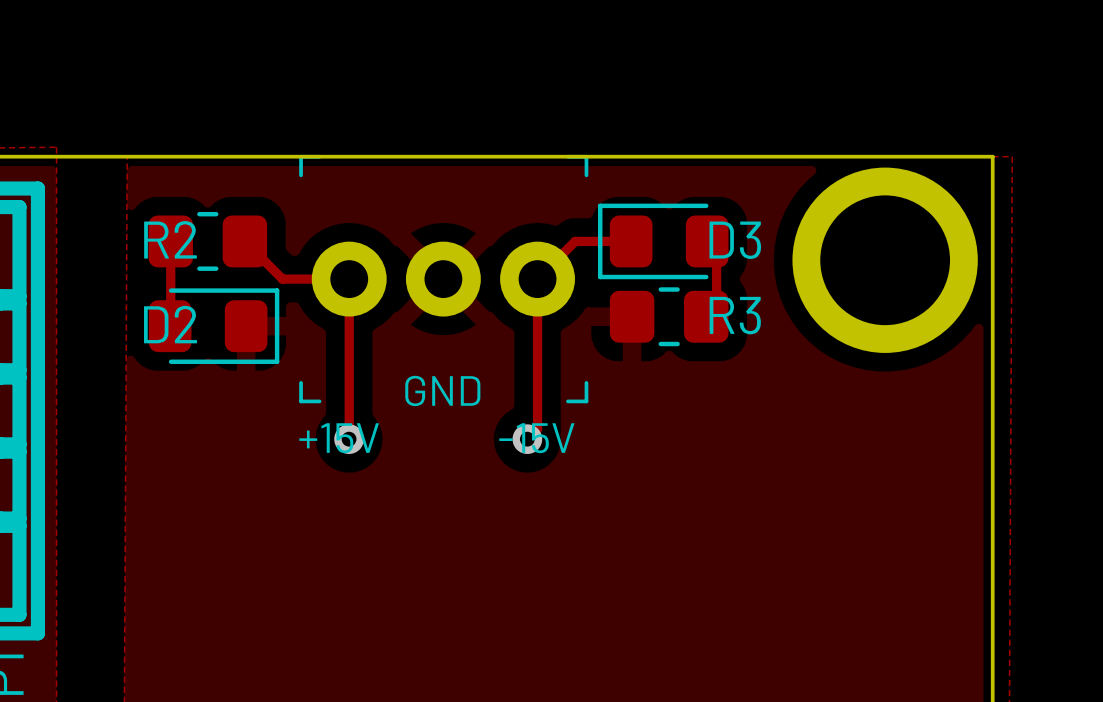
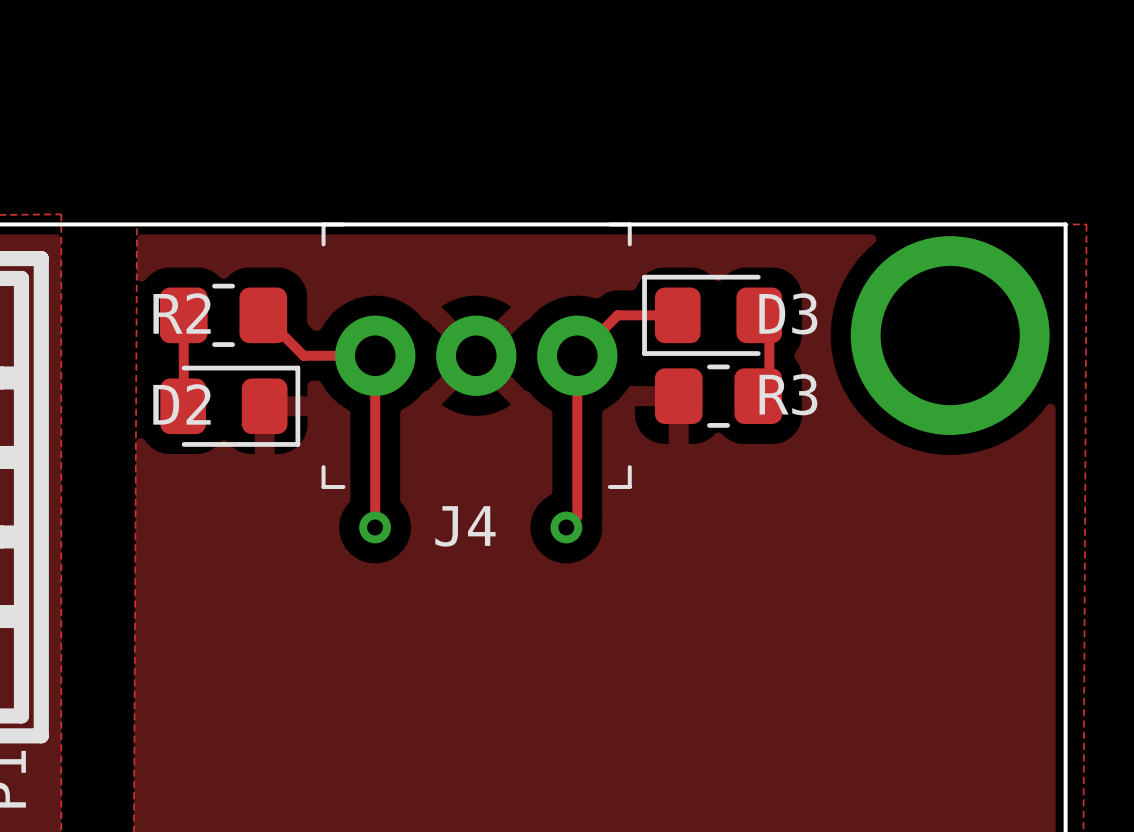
text: GND (442, 390) -> none
J4 name: none -> J4 (465, 526)
text: +15V (339, 438) -> none
text: -15V (536, 438) -> none

